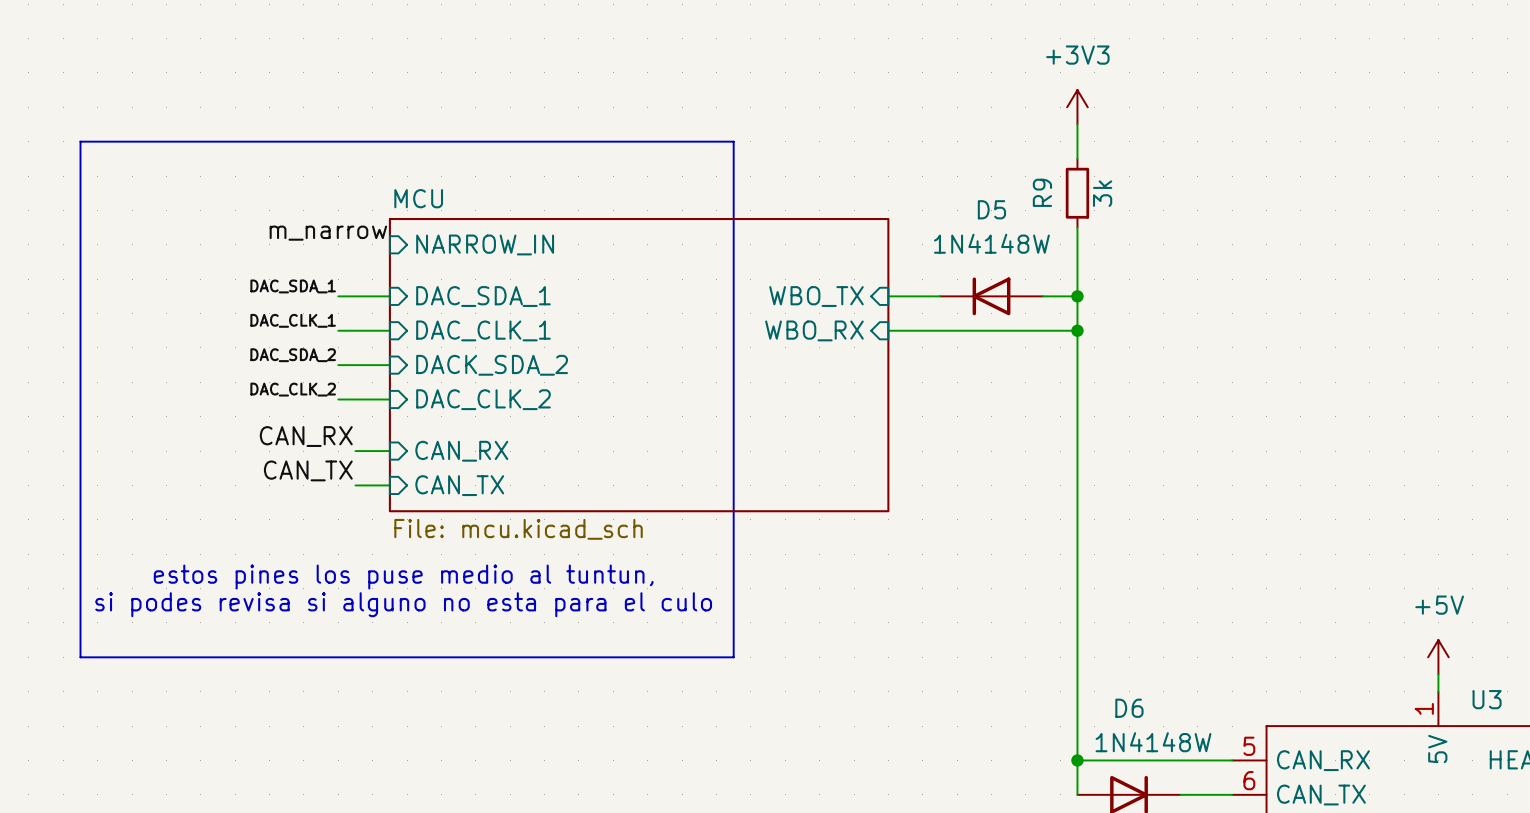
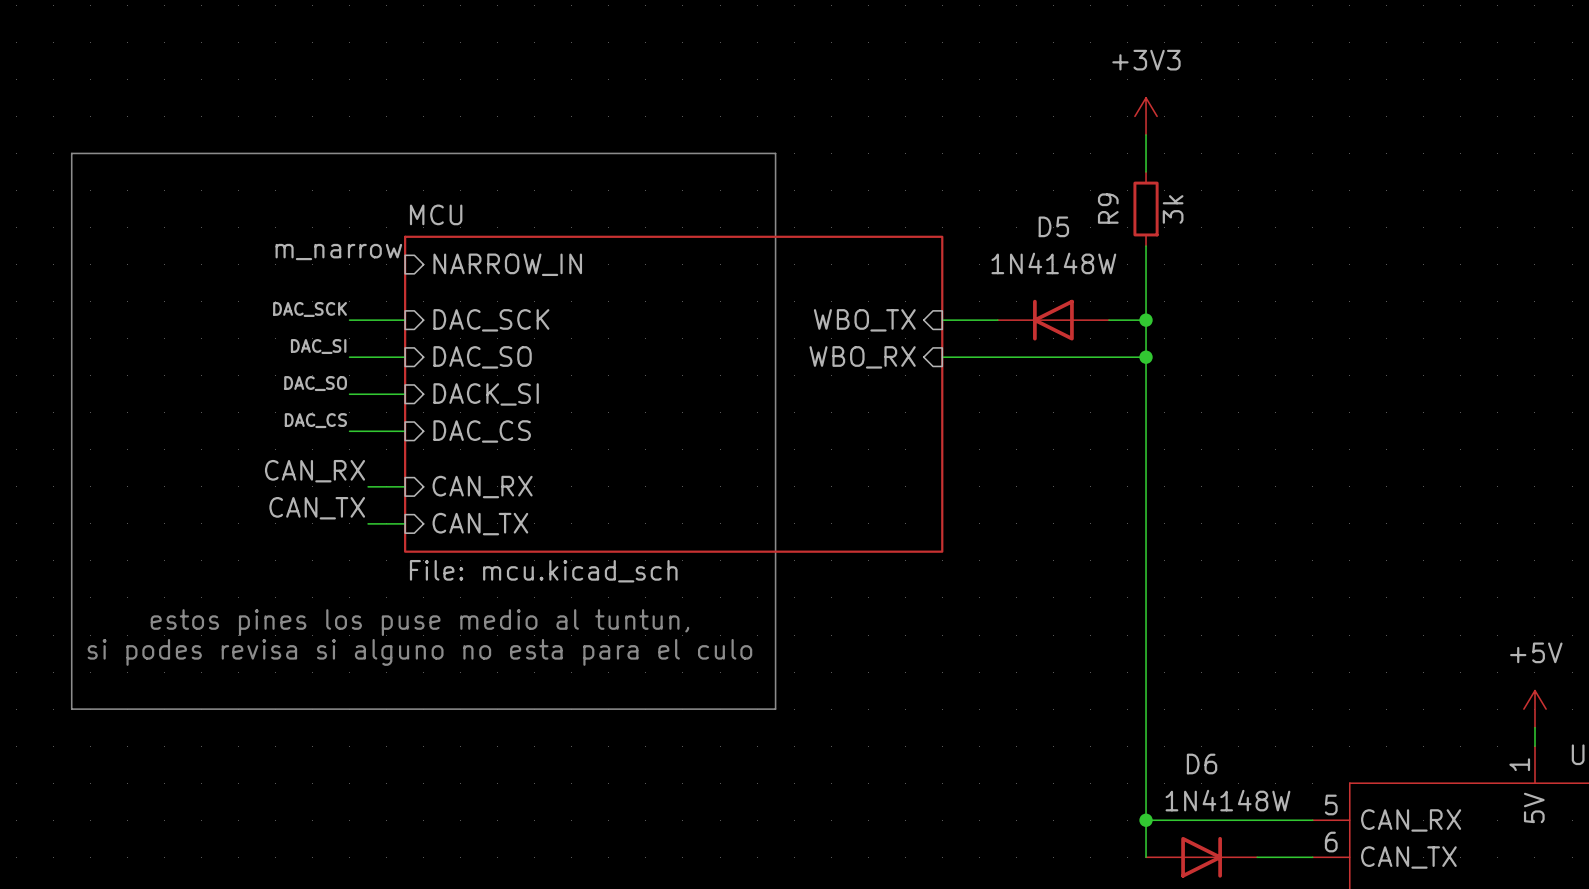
label: DAC_SDA_1 (293, 286) -> DAC_SCK (310, 309)
sheet pin: DAC_SDA_1 (483, 296) -> DAC_SCK (491, 320)
label: DAC_CLK_1 (293, 320) -> DAC_SI (318, 346)
sheet pin: DAC_CLK_1 (483, 330) -> DAC_SO (482, 357)
label: DAC_SDA_2 (293, 355) -> DAC_SO (315, 383)
sheet pin: DACK_SDA_2 (492, 365) -> DACK_SI (486, 394)
label: DAC_CLK_2 (293, 389) -> DAC_CS (315, 420)
sheet pin: DAC_CLK_2 (483, 399) -> DAC_CS (482, 431)

